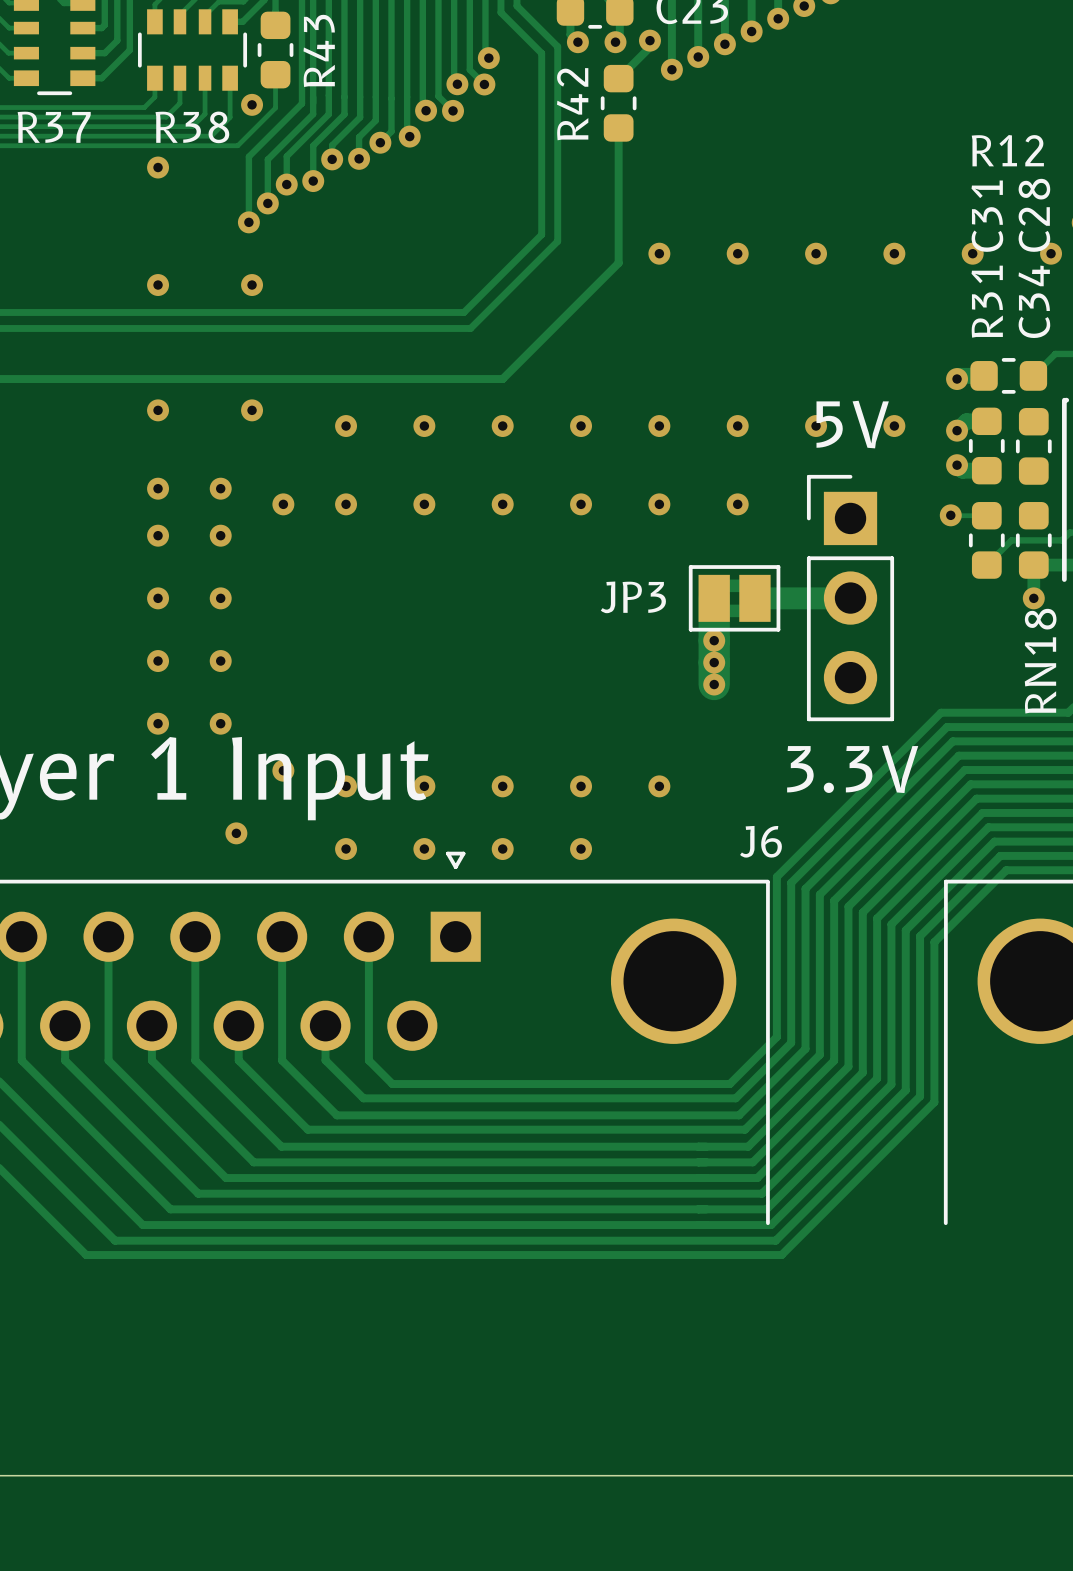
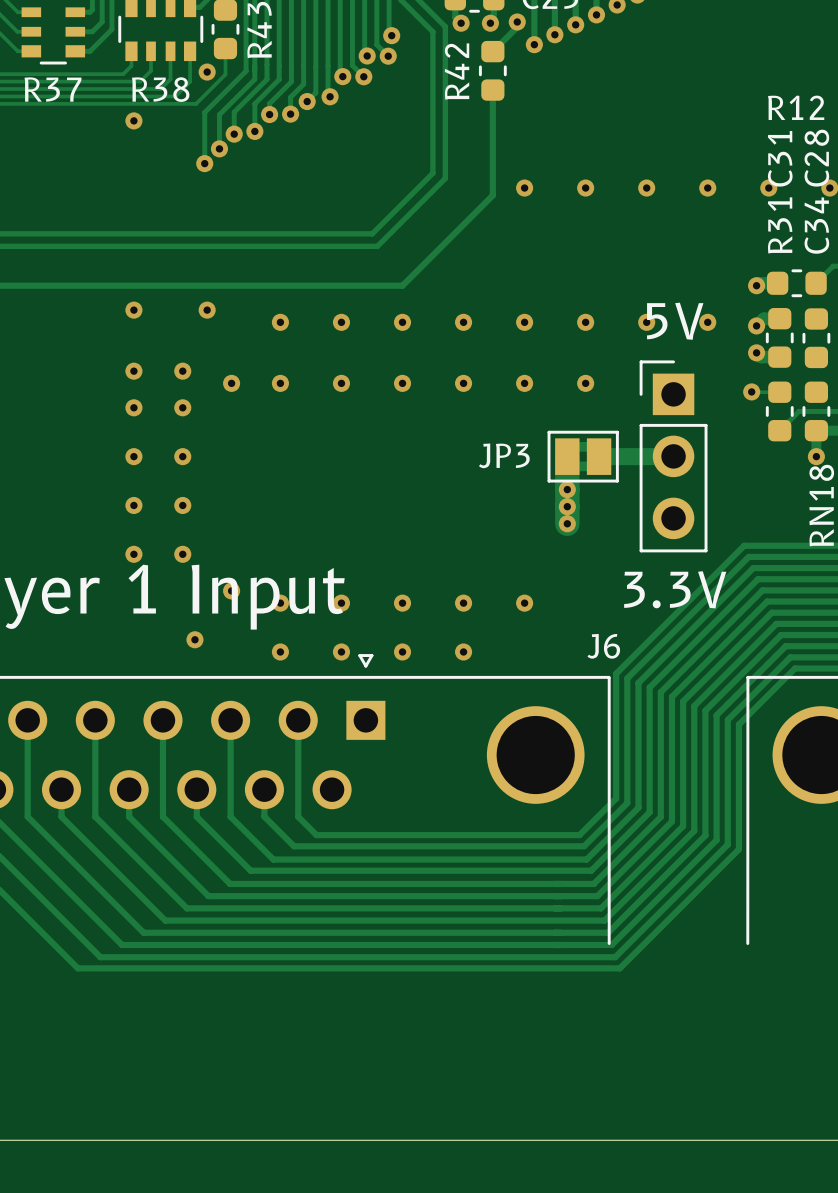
via: (158, 285) -> none
via: (252, 285) -> none

